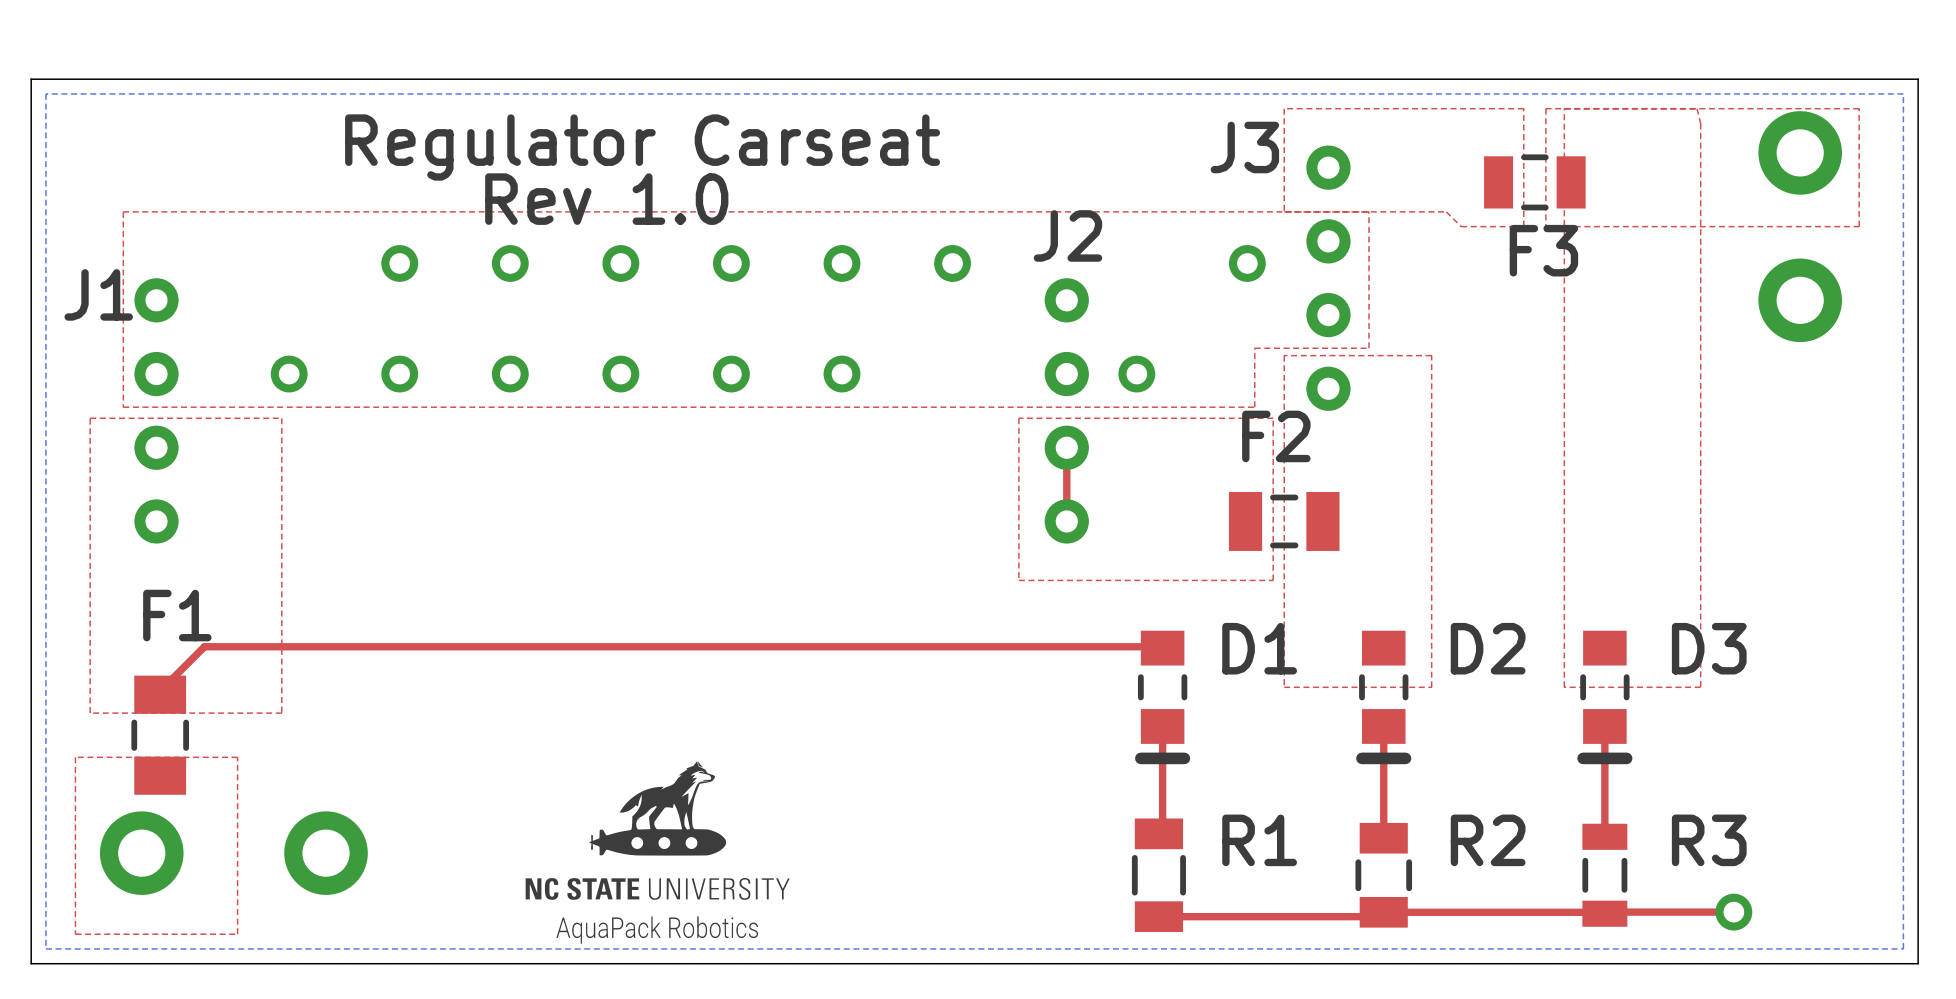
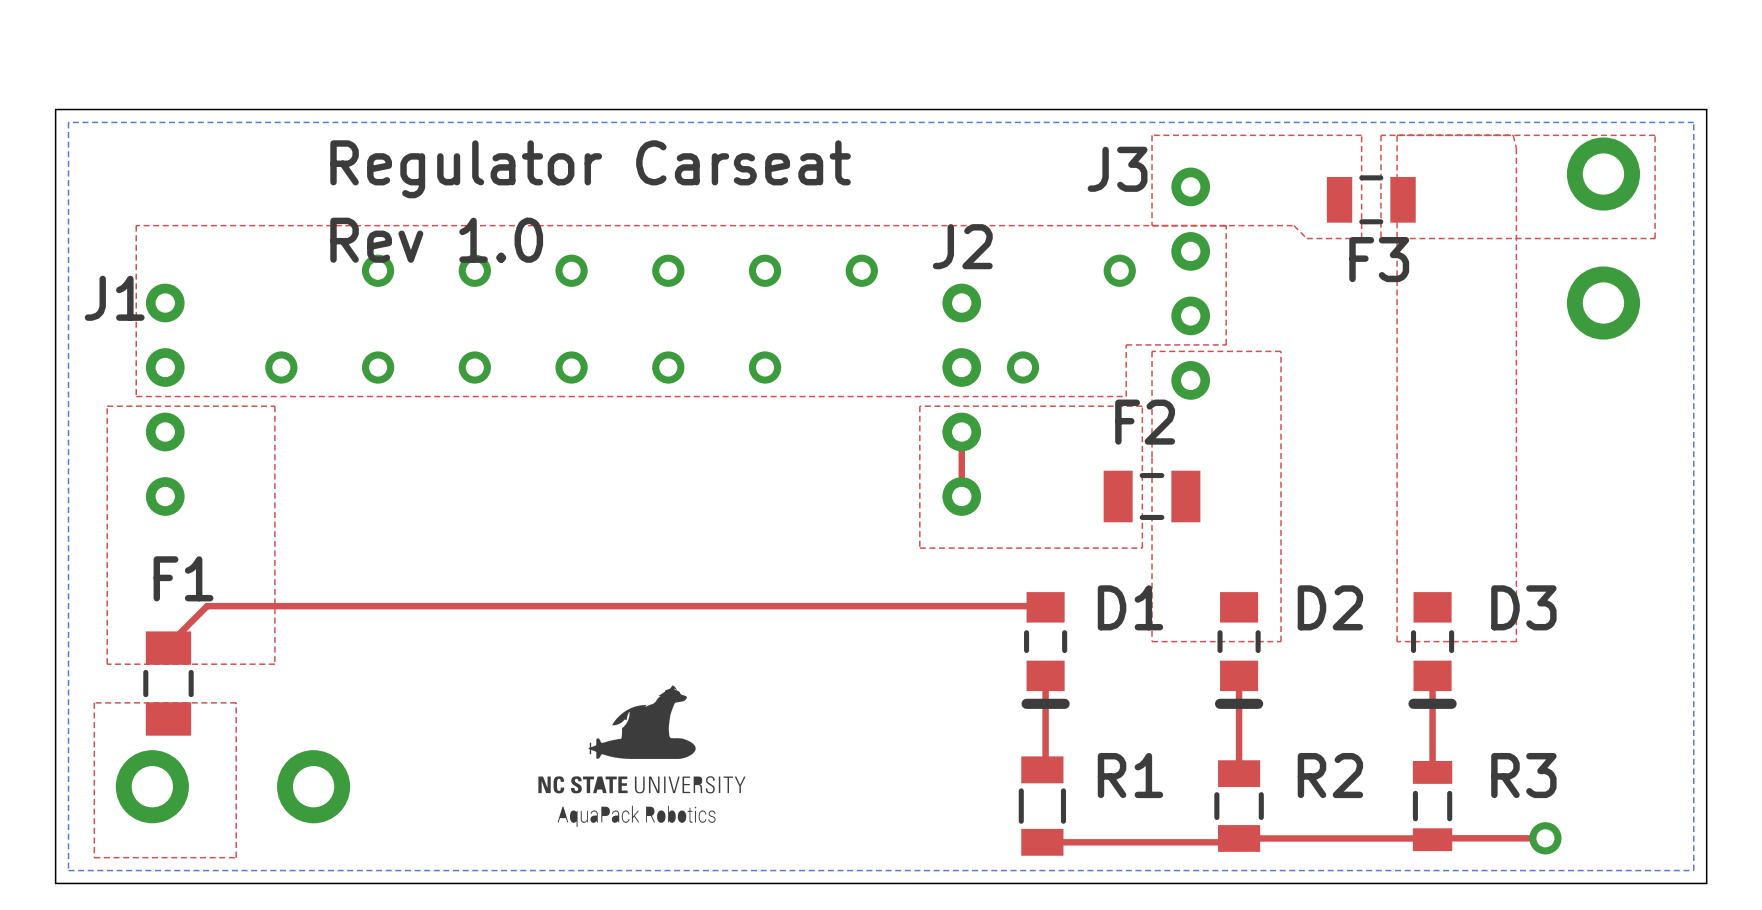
text position: Rev 1.0 (606, 199) -> Rev 1.0 (436, 240)
drawing: none -> [538, 685, 746, 828]
drawing: [525, 761, 790, 944] -> none

